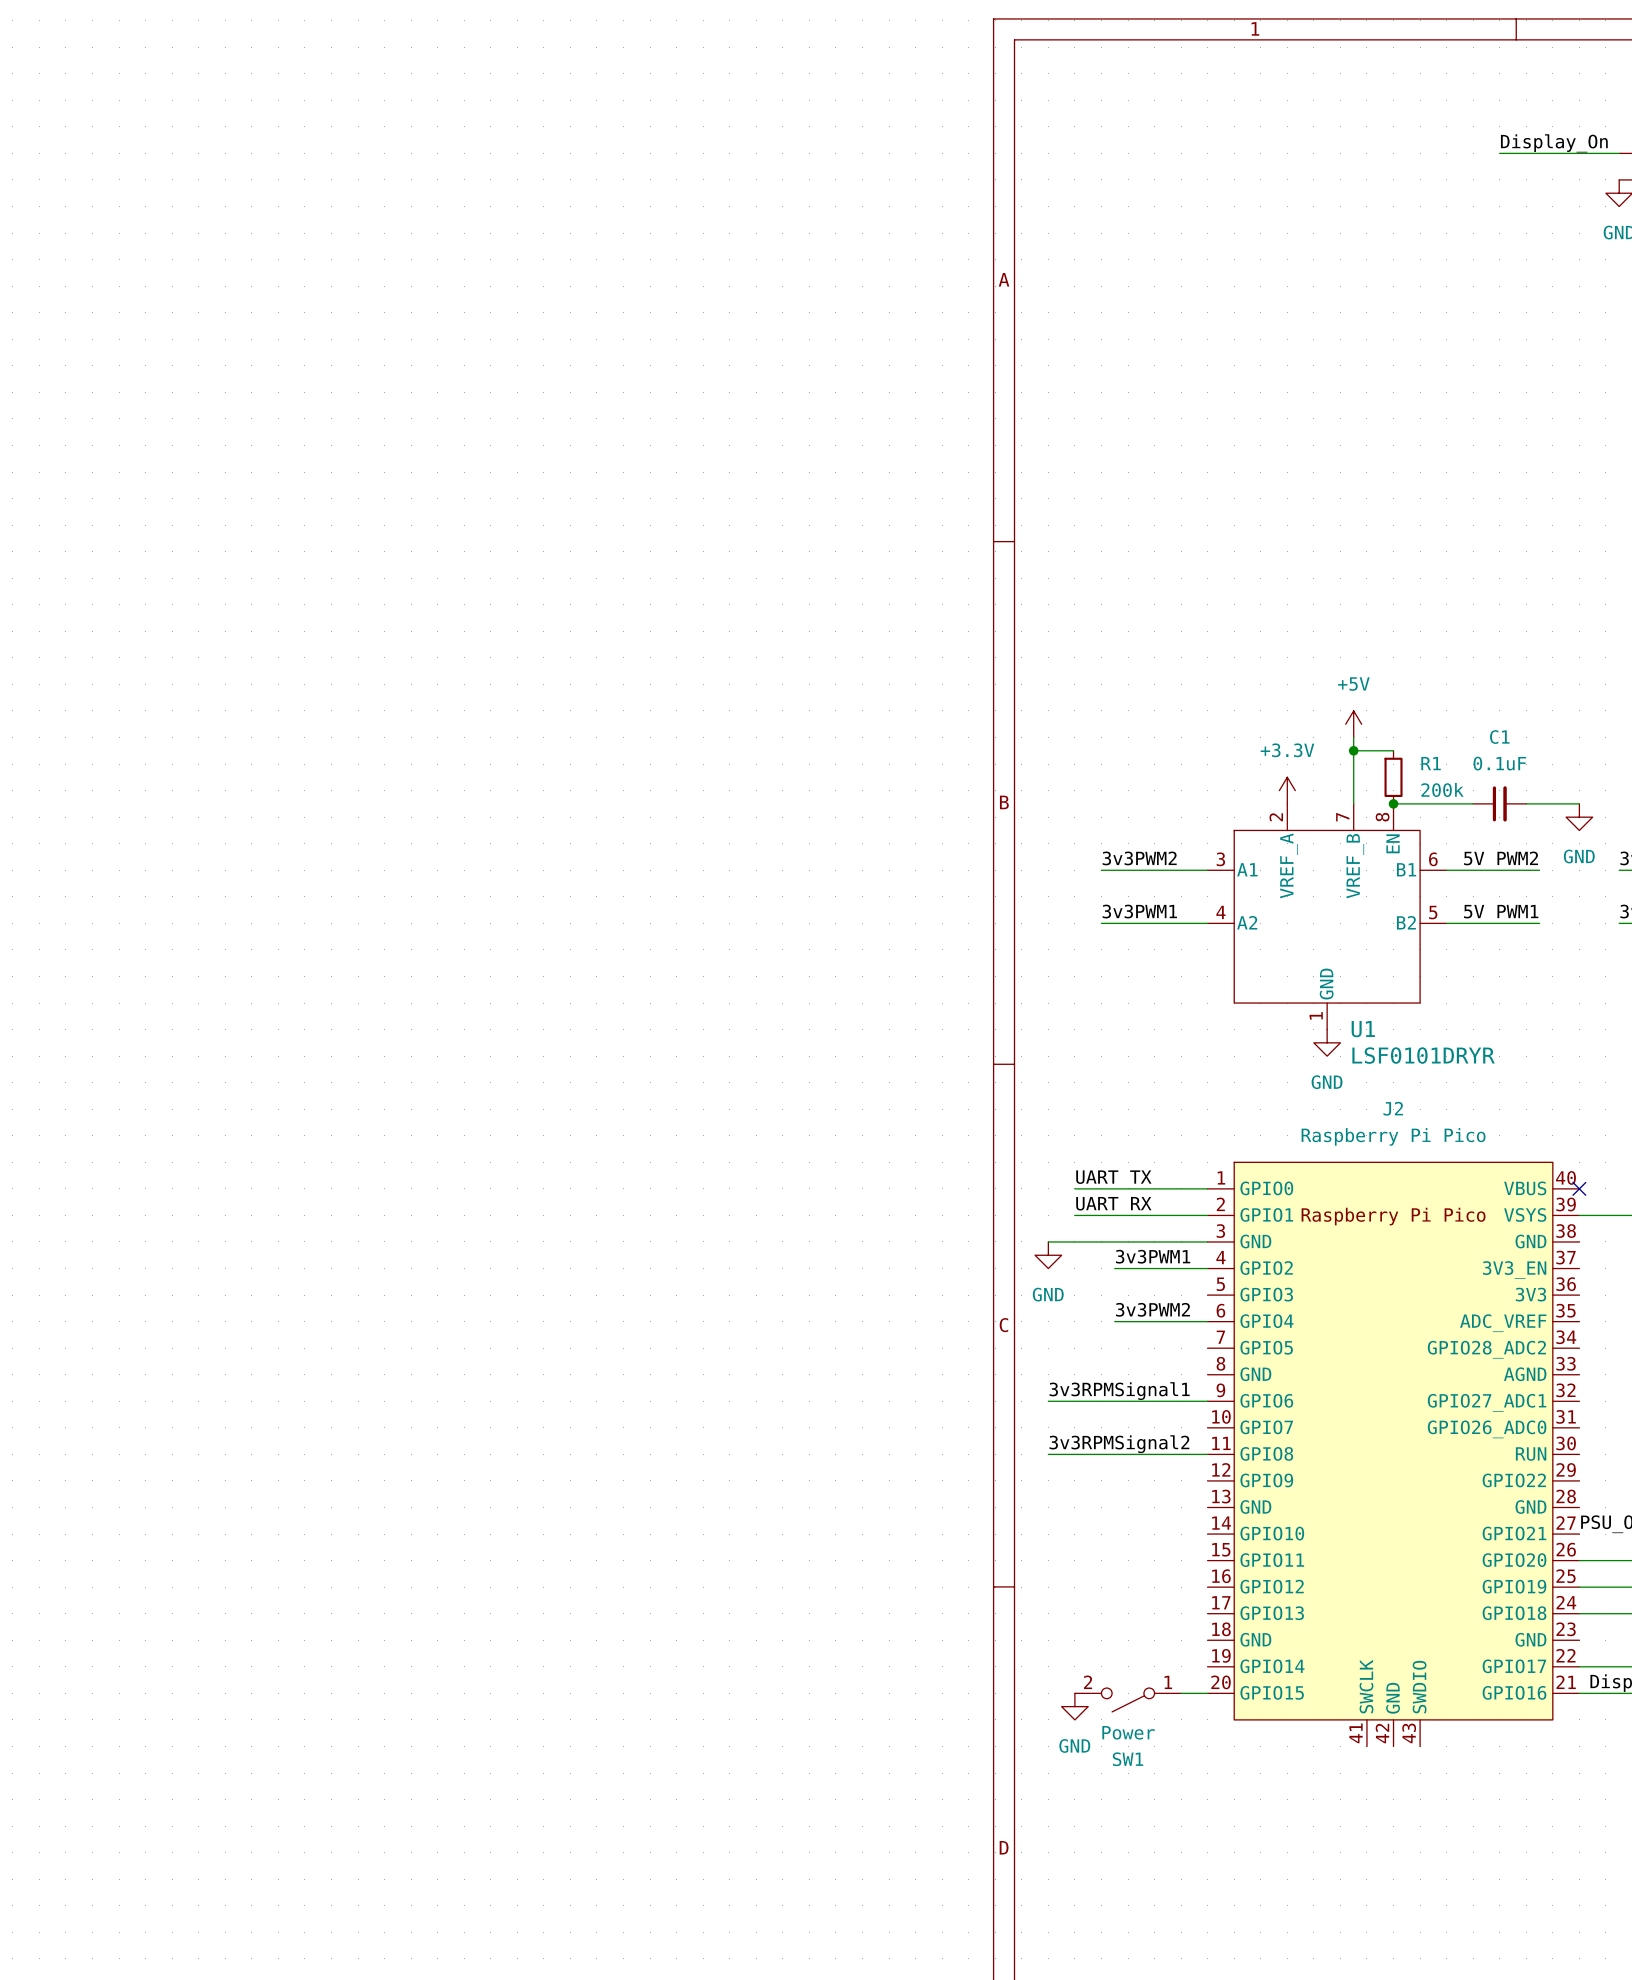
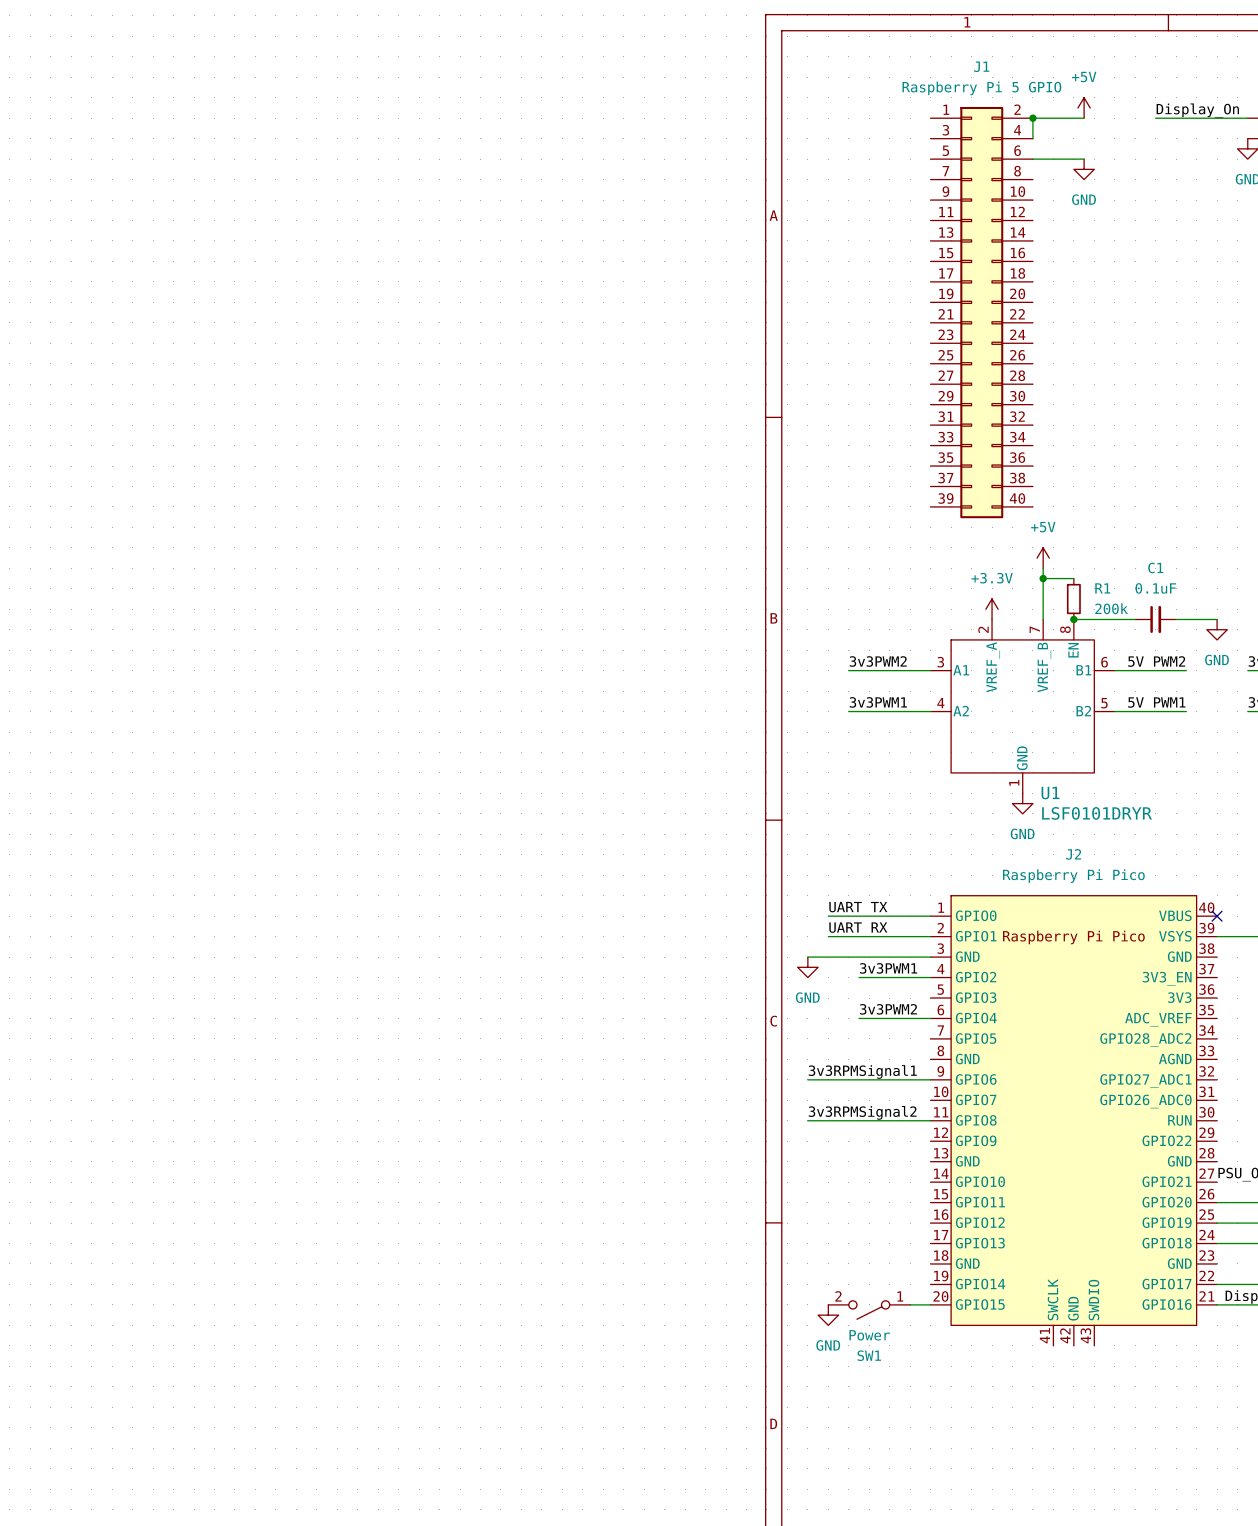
power symbol: none -> +5V (1084, 107)
junction: none -> (1032, 118)
wire: none -> (1084, 118) (1032, 118) (1032, 138)
wire: none -> (1032, 159) (1084, 159)
power symbol: none -> GND (1084, 169)
J1: none -> Raspberry Pi 5 GPIO (981, 312)

